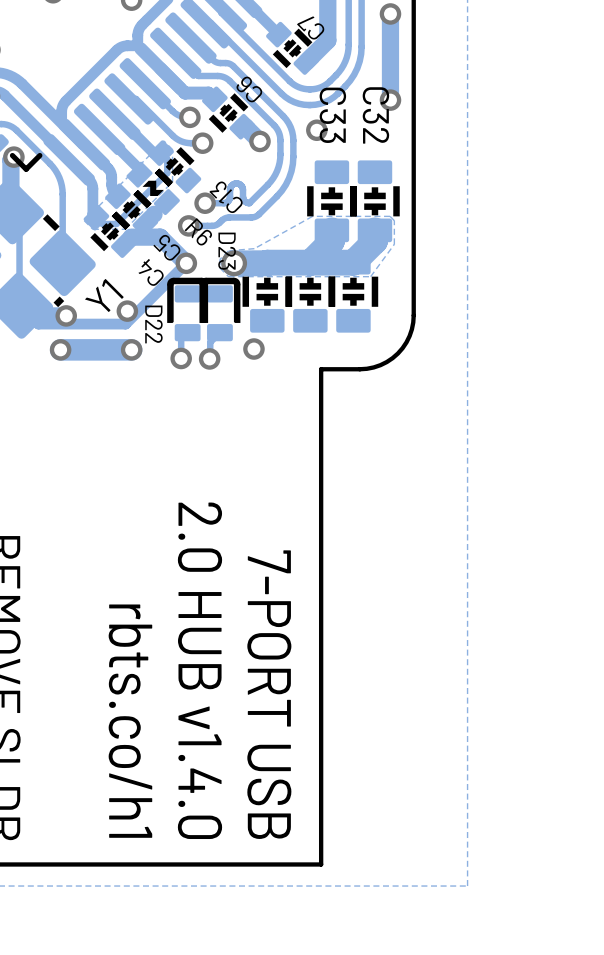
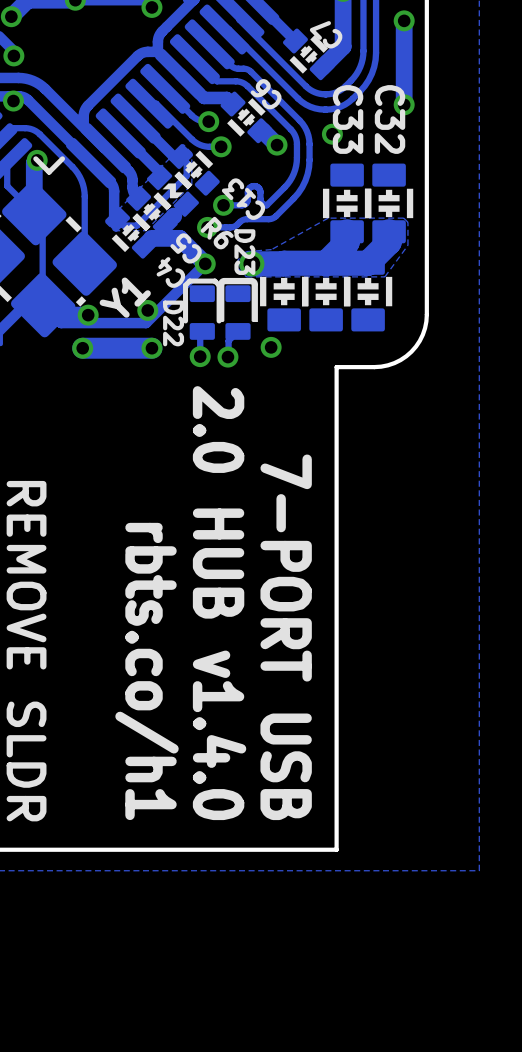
D22 footprint: [167, 277, 209, 342] -> [183, 278, 222, 340]

